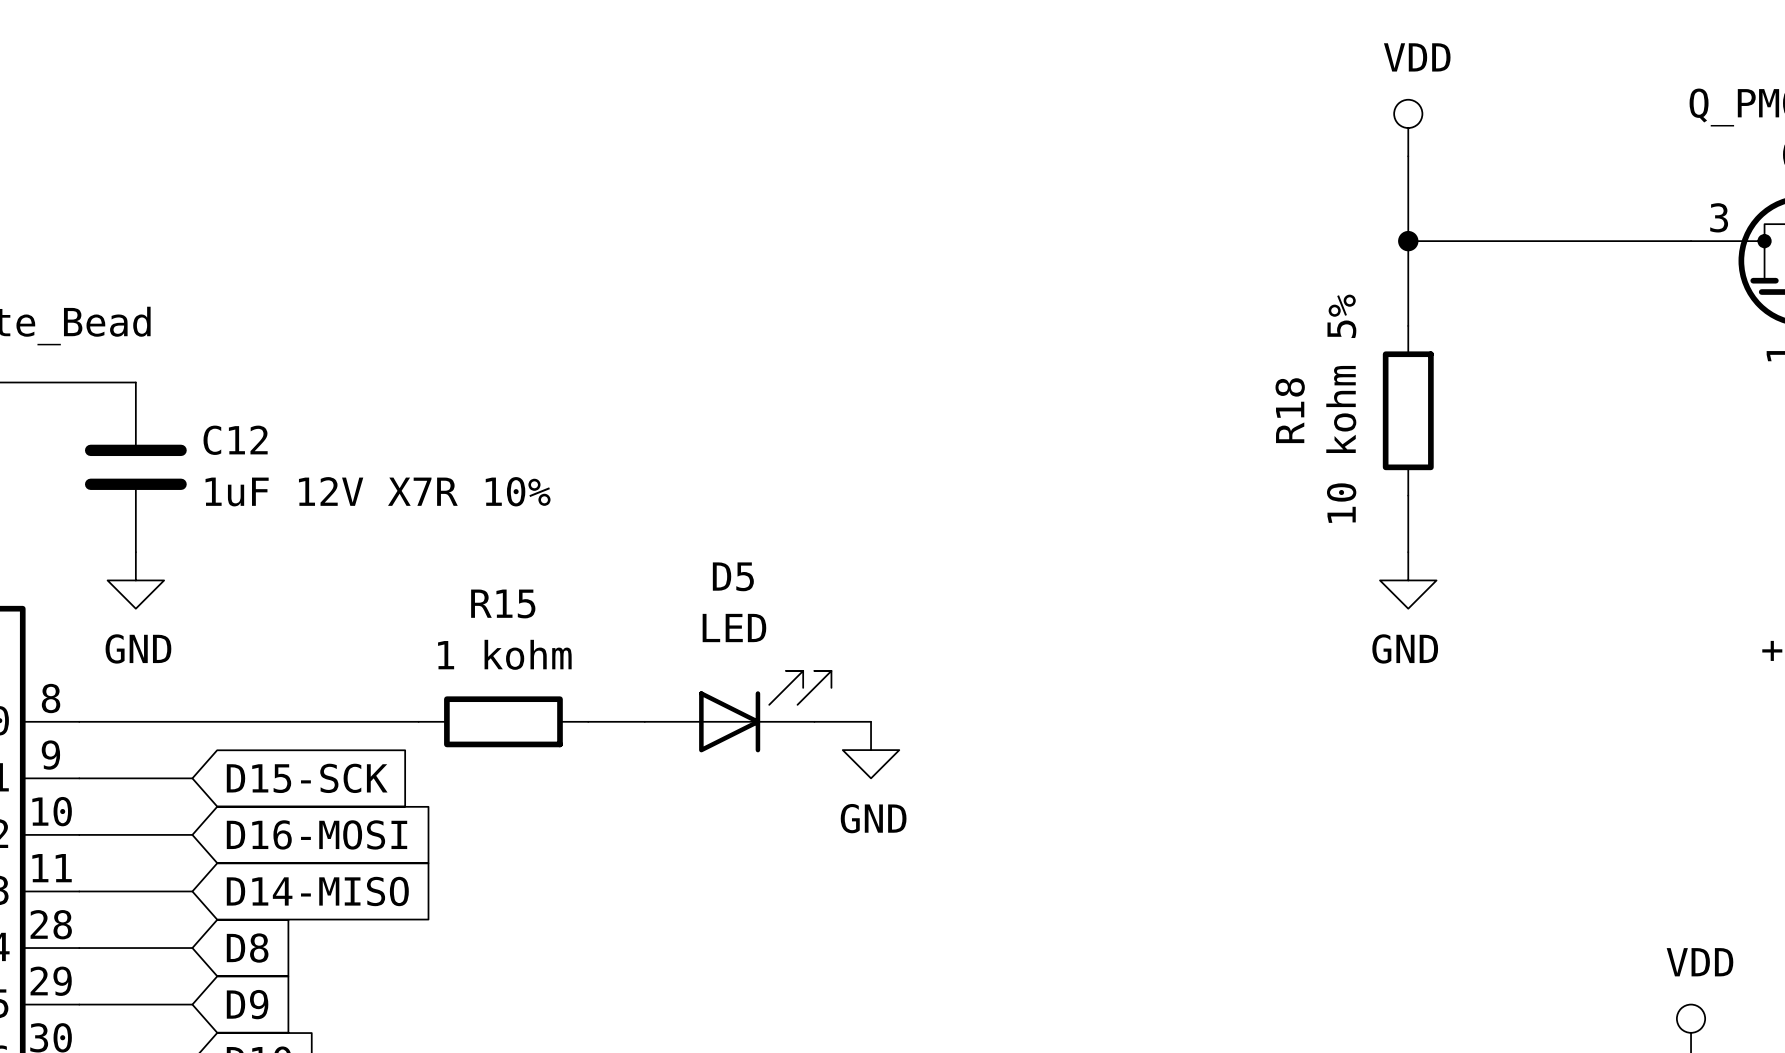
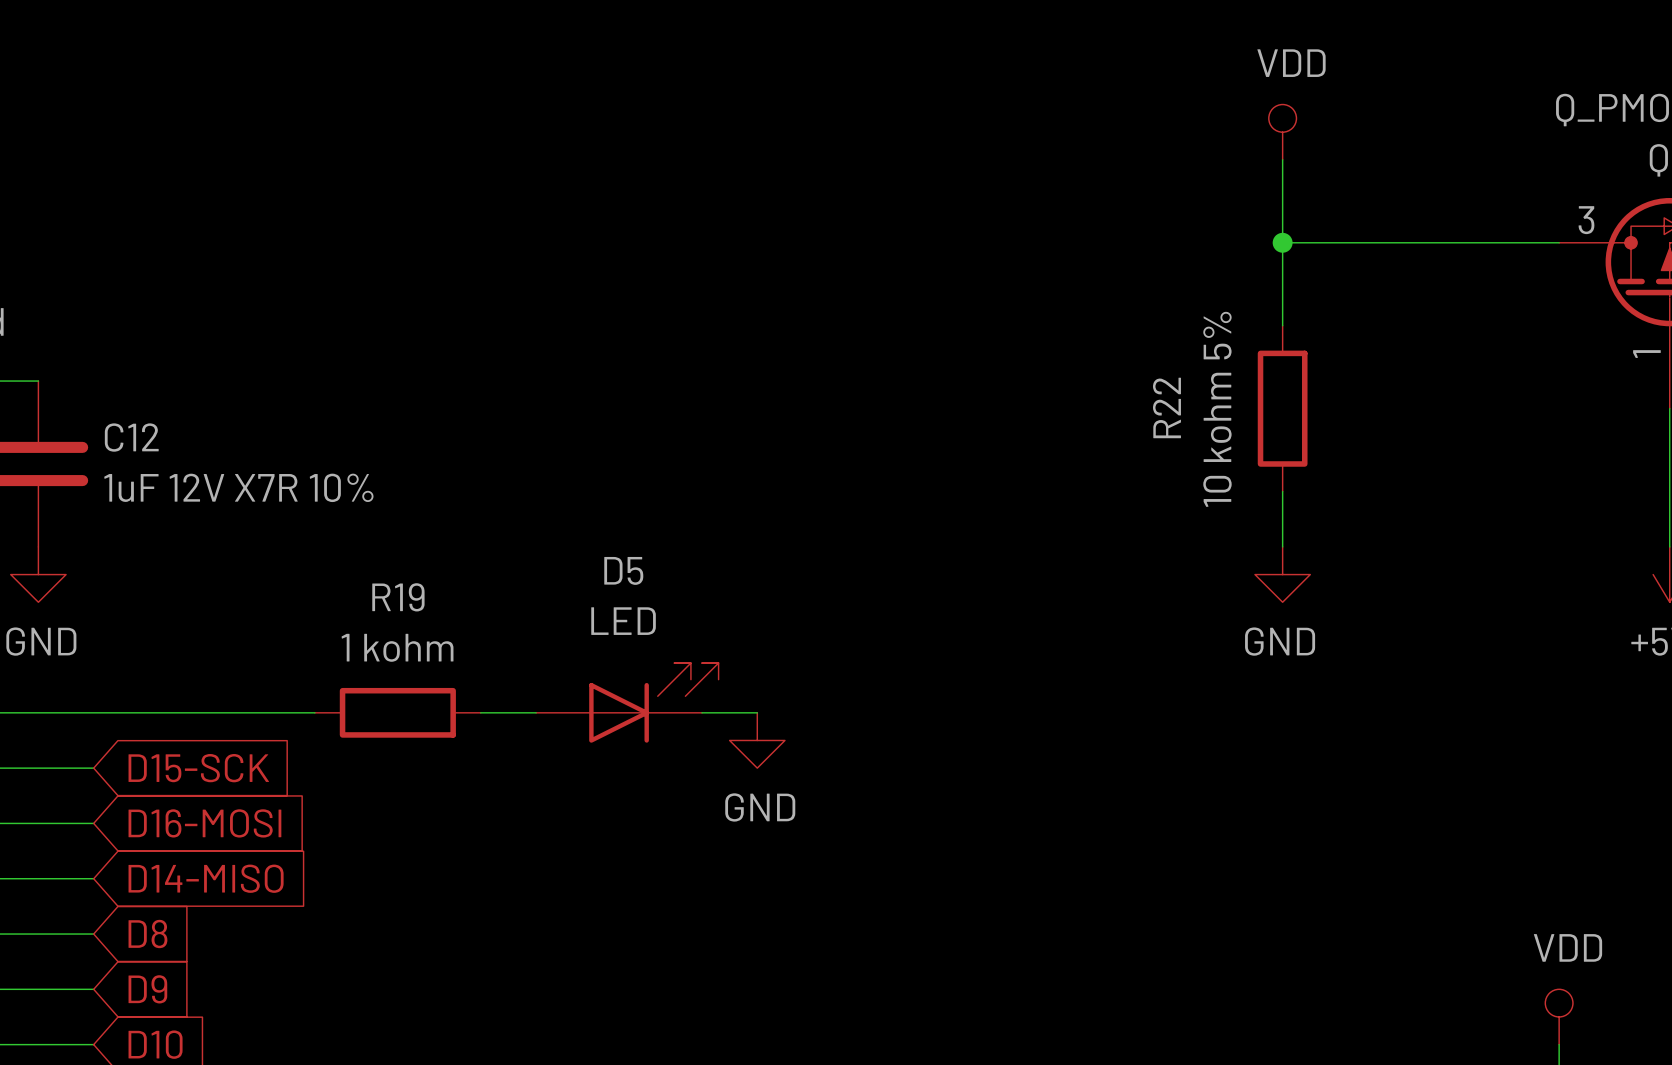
R18 name: R18 (1290, 410) -> R22 (1166, 407)
R15 name: R15 (503, 603) -> R19 (398, 597)

